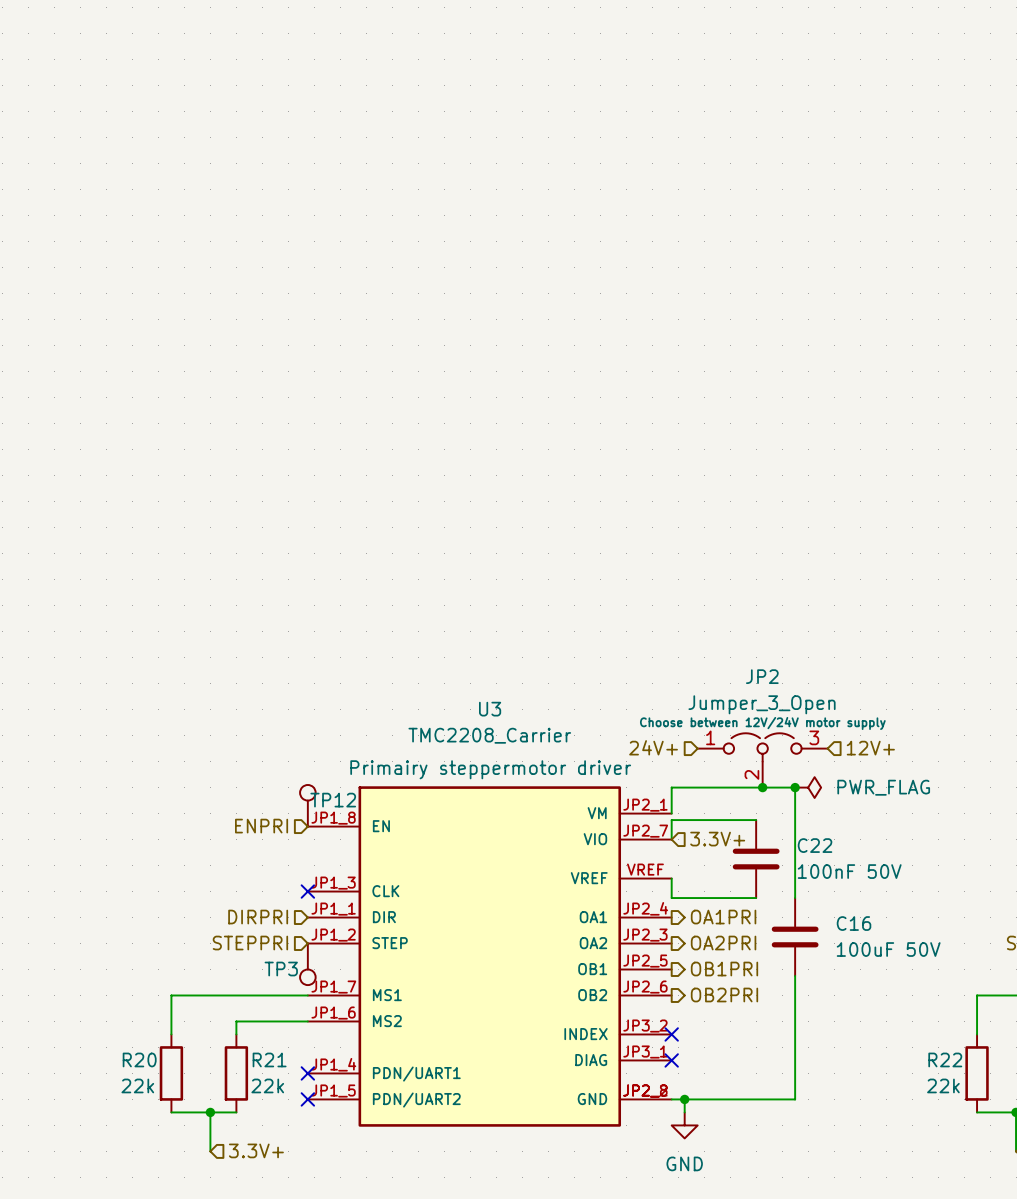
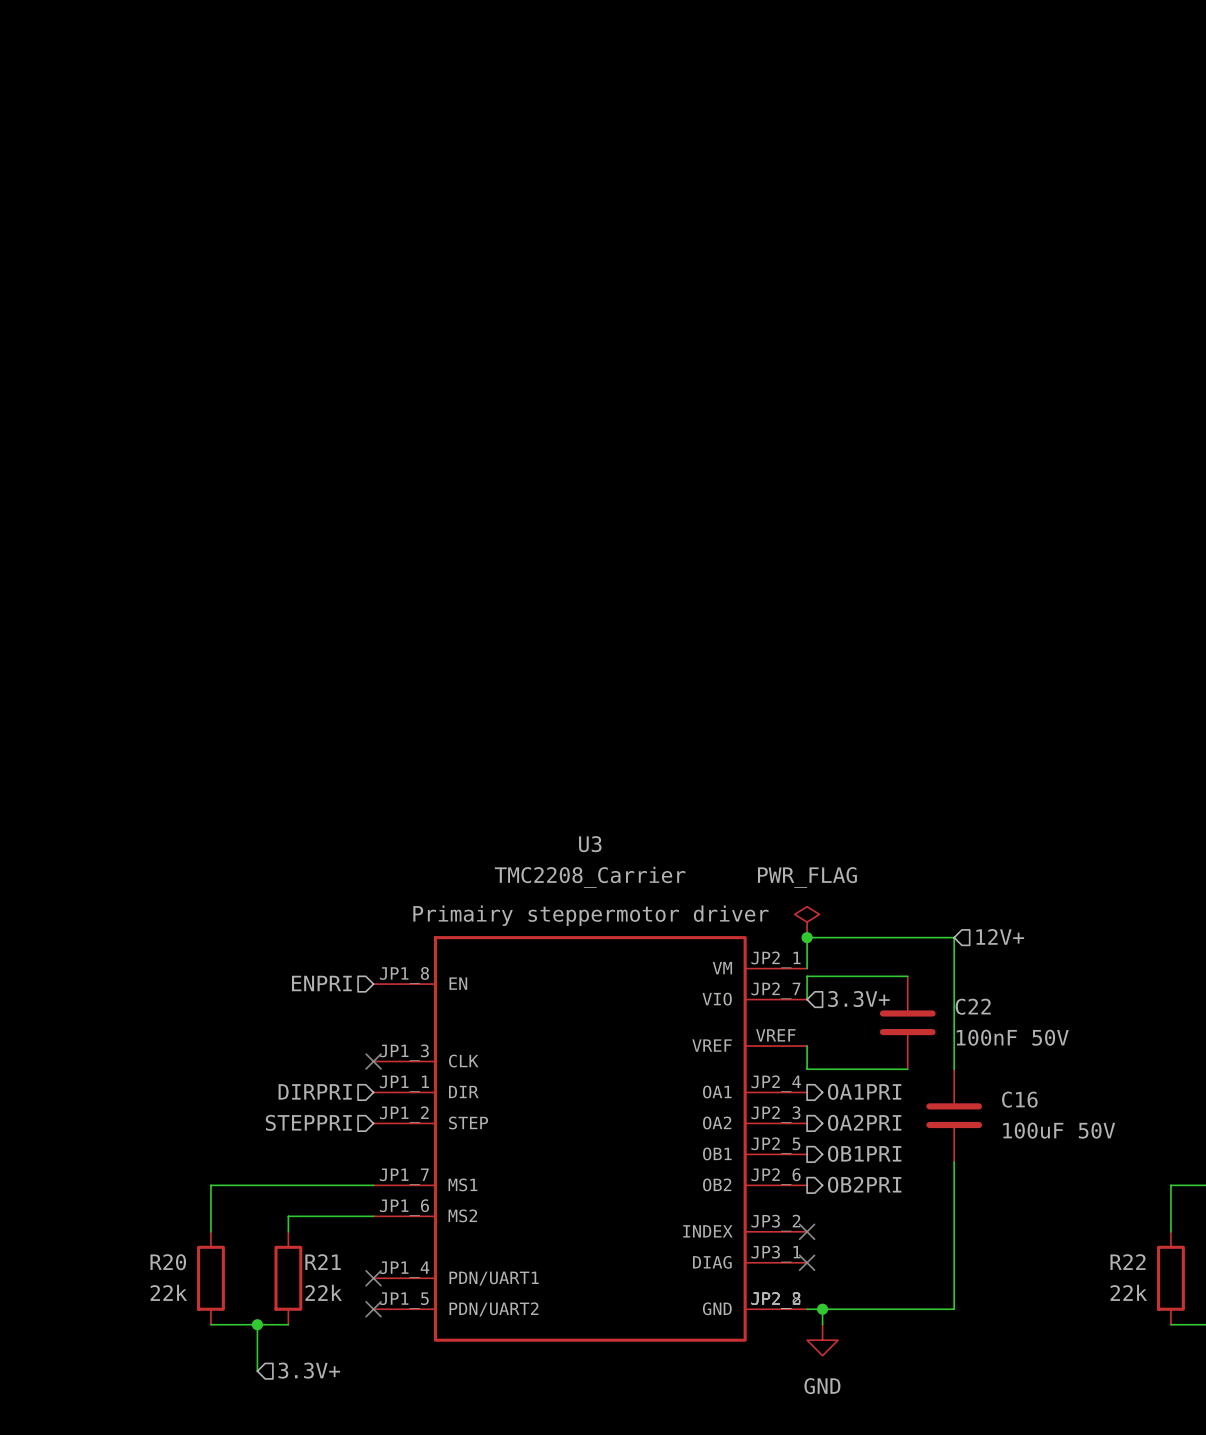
hierarchical label: 24V+ (653, 747) -> none
hierarchical label position: 12V+ (870, 748) -> 12V+ (1000, 936)
JP2: Jumper_3_Open (762, 760) -> none
junction: none -> (807, 937)
junction: (762, 787) -> none
junction: (795, 787) -> none
power symbol rotation: 0° (808, 787) -> 90° counterclockwise (807, 922)
power symbol position: PWR_FLAG (808, 787) -> PWR_FLAG (807, 922)
power symbol text position: PWR_FLAG (883, 787) -> PWR_FLAG (807, 877)
TP12: (307, 805) -> none
TP3: (307, 964) -> none

